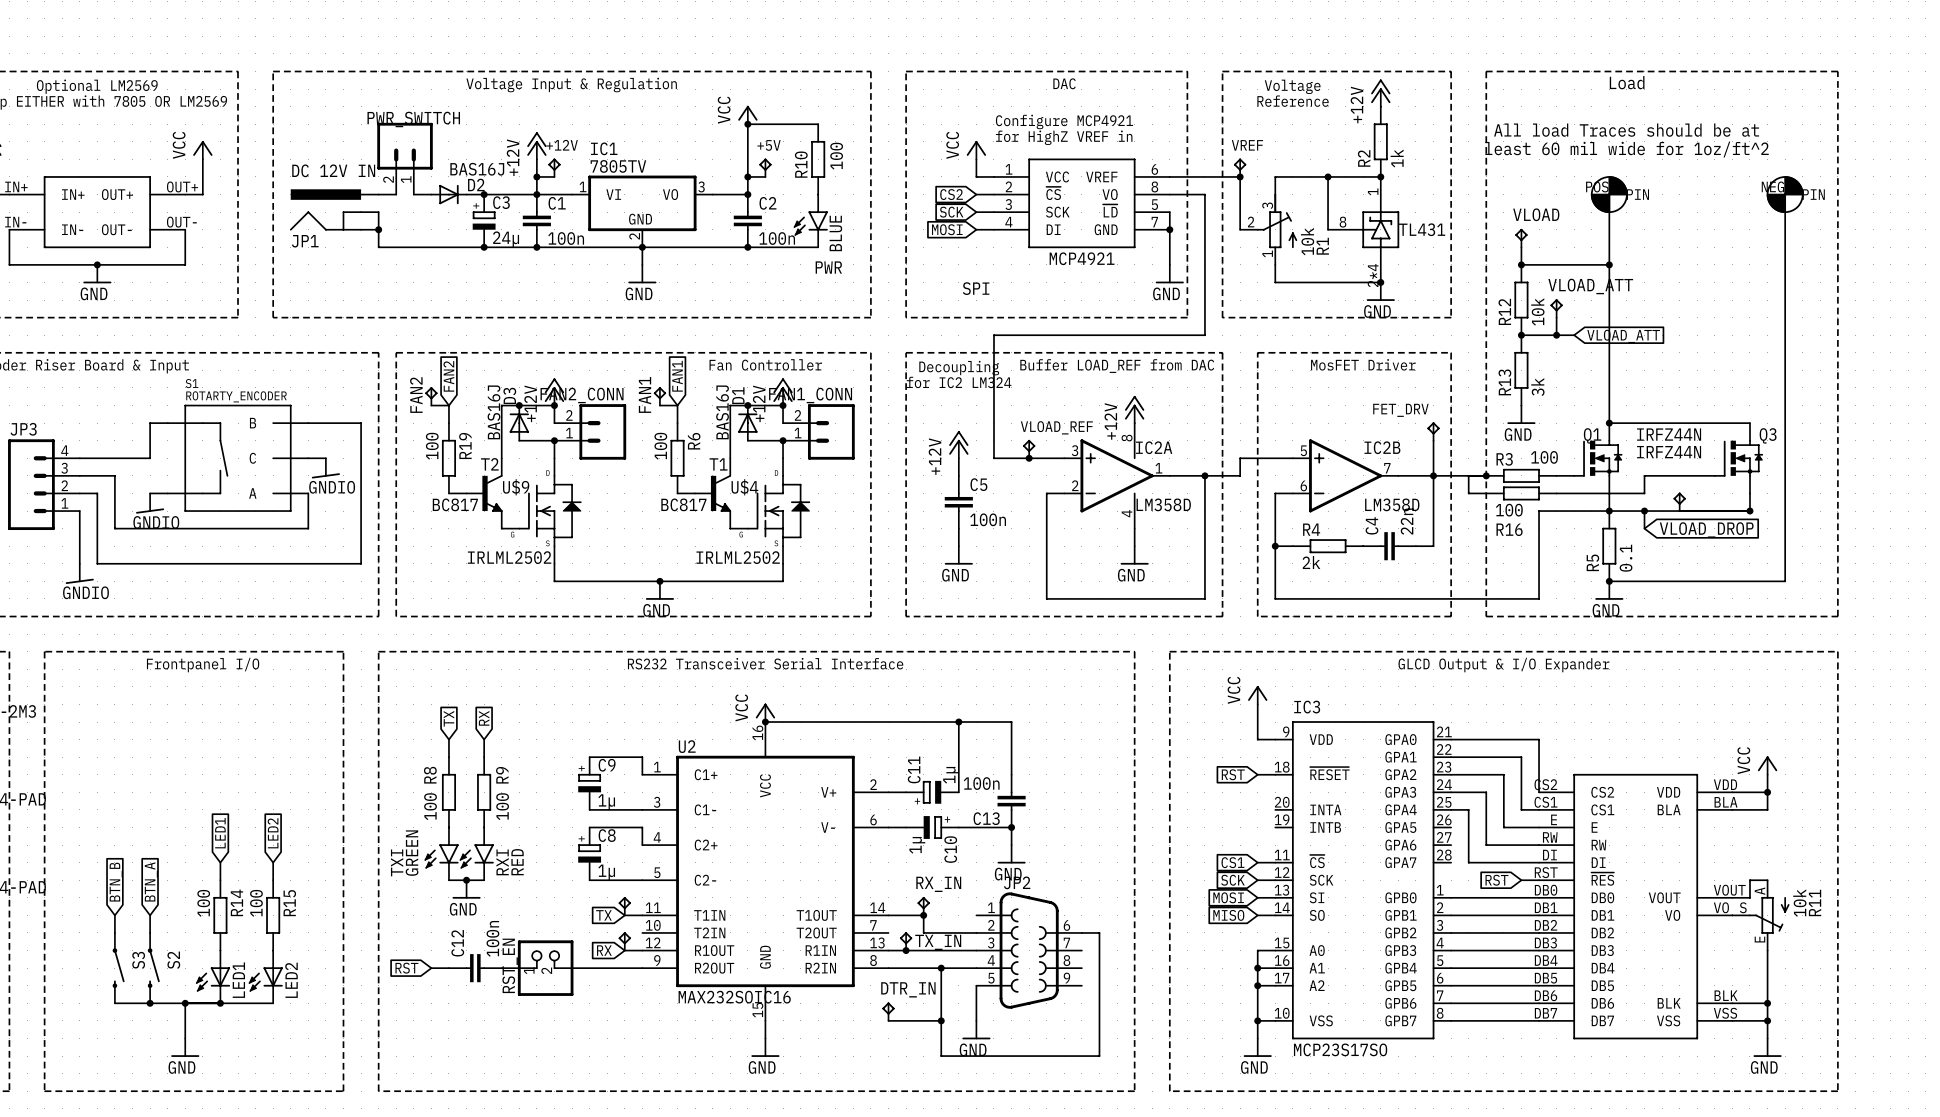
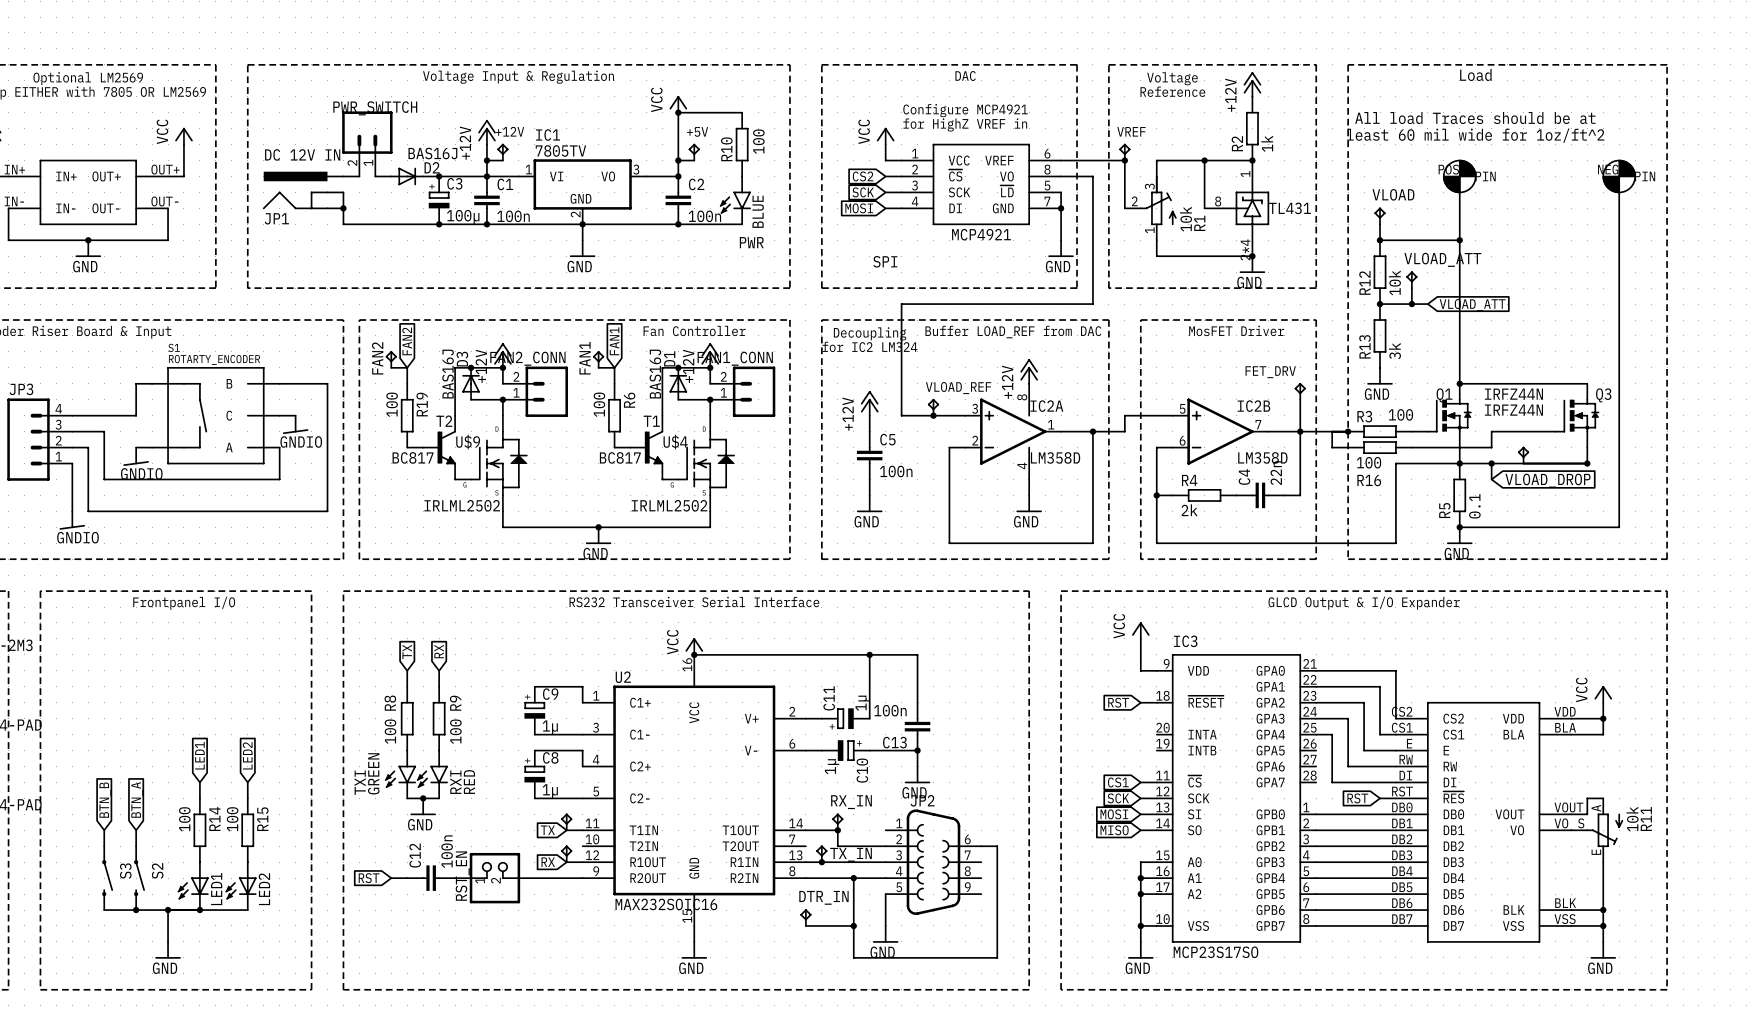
C3 value: 24µ (506, 239) -> 100µ (463, 217)

